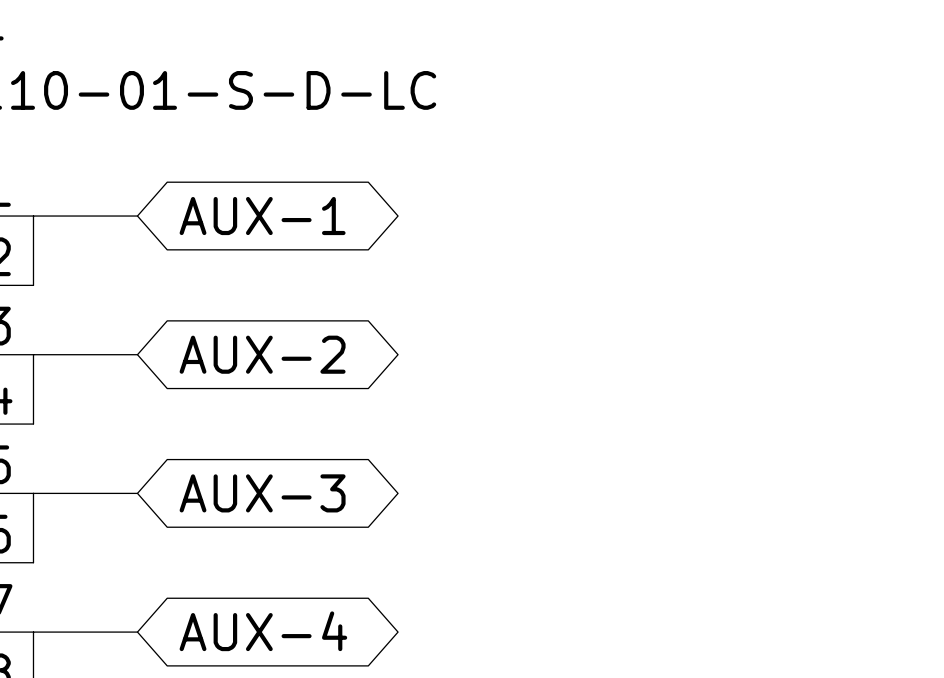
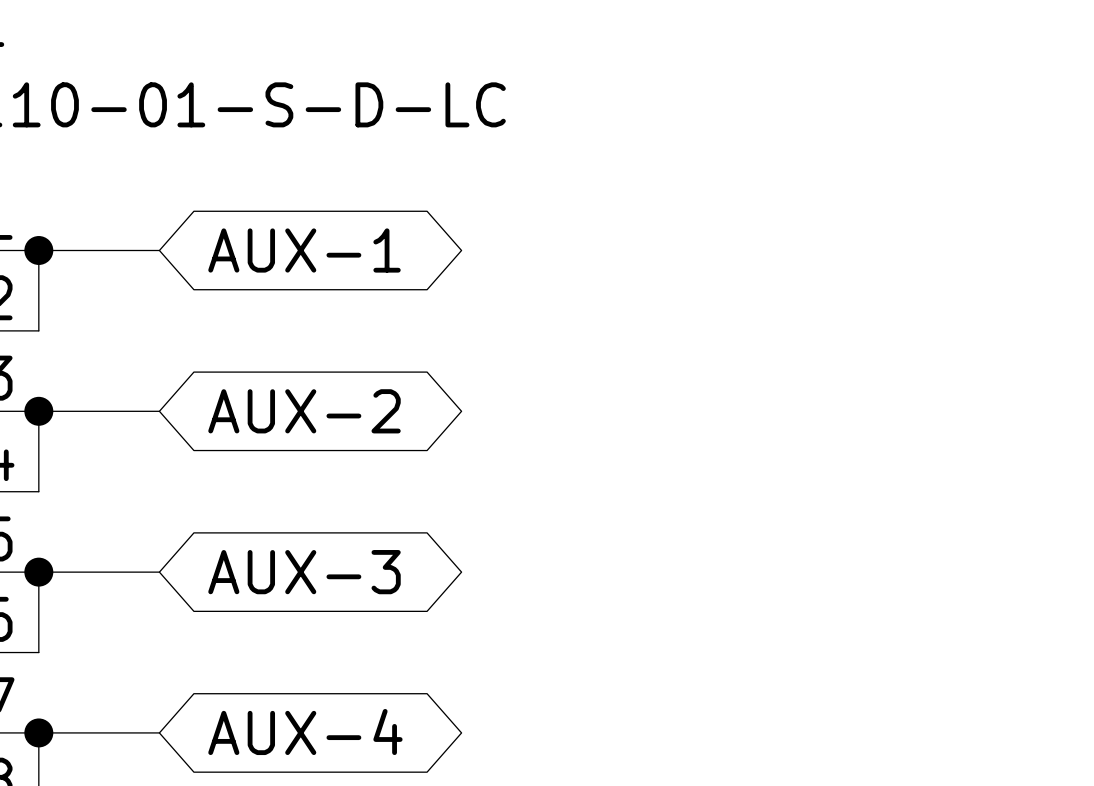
junction: none -> (38, 250)
junction: none -> (38, 411)
junction: none -> (38, 572)
junction: none -> (38, 732)

